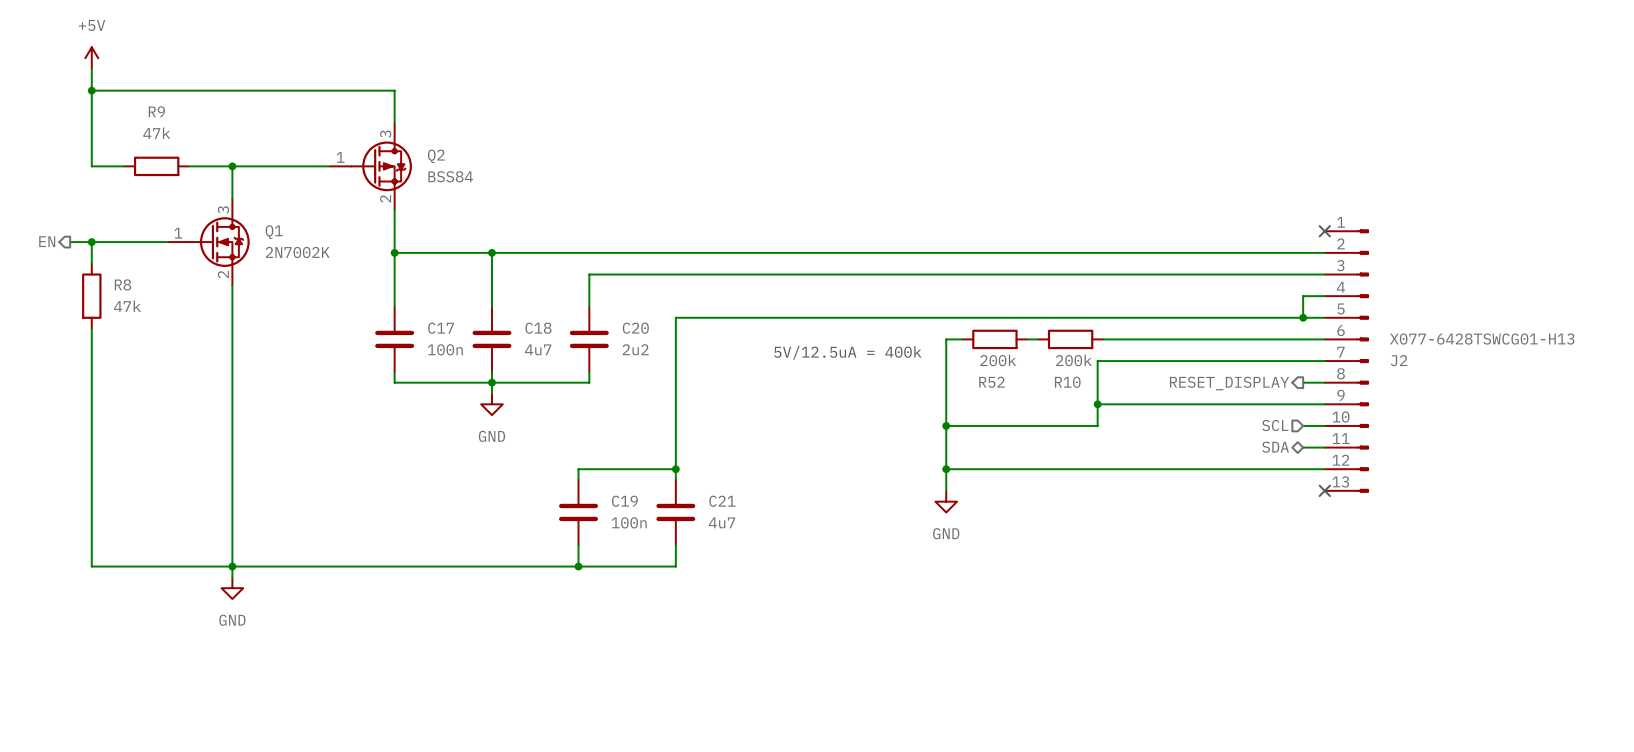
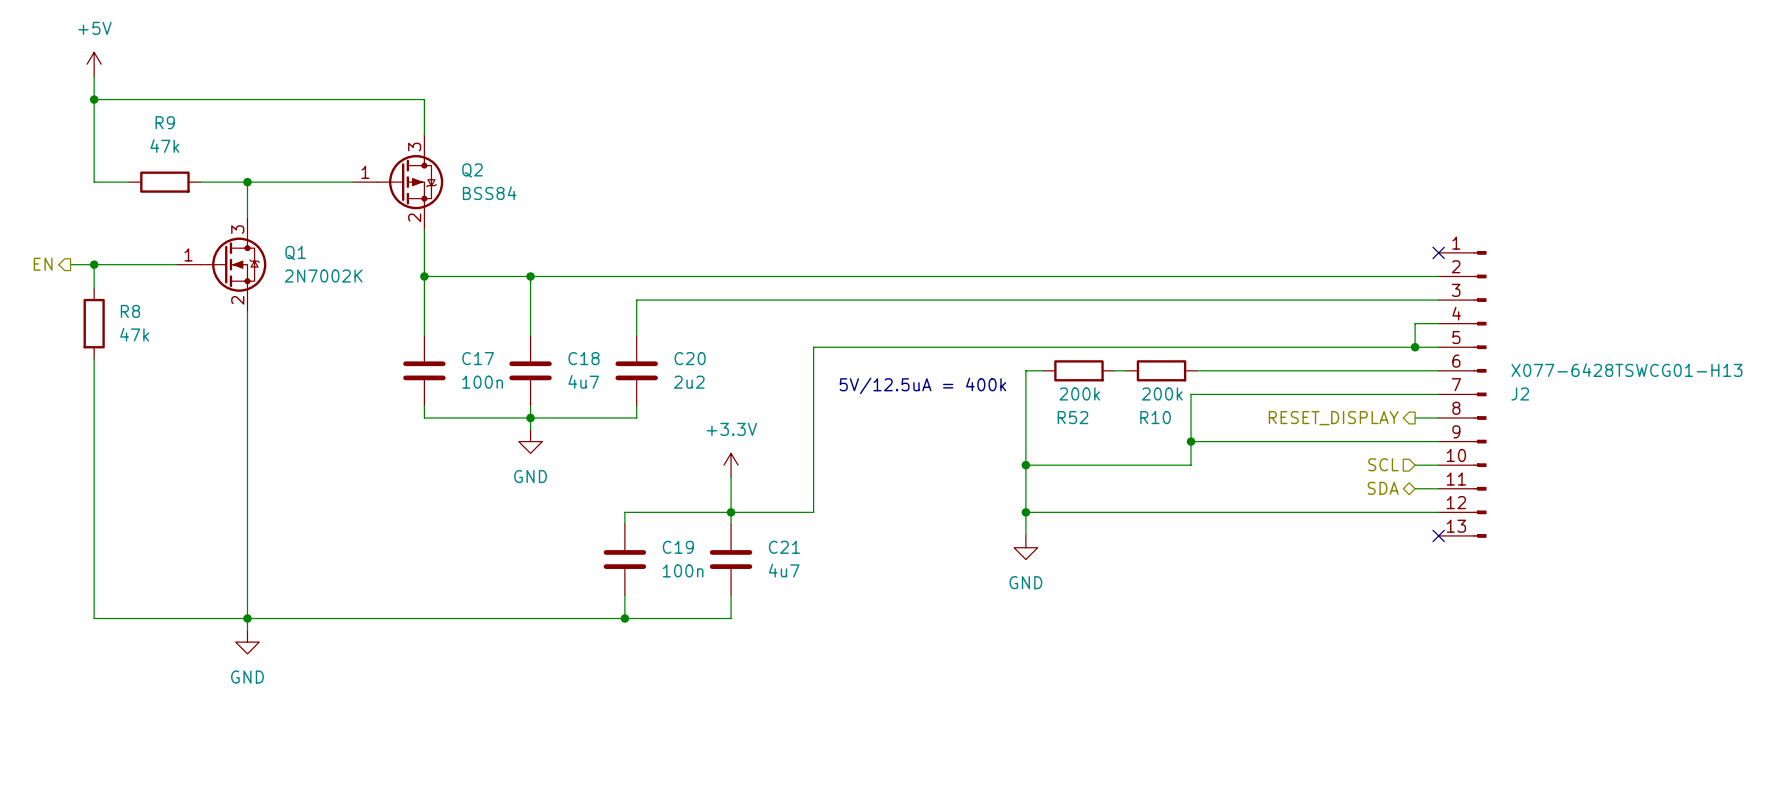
wire: (751, 317) (675, 317) (675, 436) -> (813, 347) (813, 512) (731, 512)
power symbol: none -> +3.3V (731, 465)

